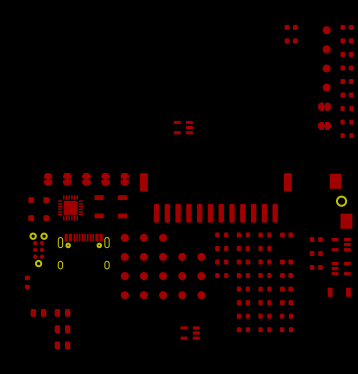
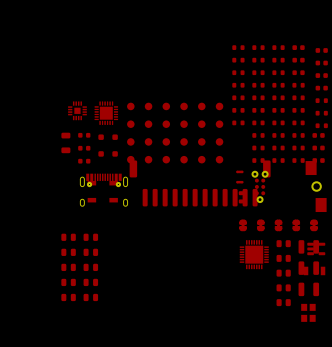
part: (291, 27) -> none
part: (347, 27) -> none
part: (326, 30) -> none
part: (291, 40) -> none
part: (347, 40) -> none
part footprint: [322, 45, 331, 54] -> [292, 45, 305, 50]
part: none -> (238, 47)
part: none -> (258, 47)
part: none -> (278, 47)
part: none -> (238, 60)
part: none -> (258, 60)
part: none -> (278, 60)
part: none -> (298, 60)
part: (326, 68) -> none
part: none -> (238, 72)
part: none -> (258, 72)
part: none -> (278, 72)
part: none -> (298, 72)
part: (326, 87) -> none
part: none -> (238, 85)
part: none -> (258, 85)
part: none -> (278, 85)
part: none -> (298, 85)
part footprint: [318, 102, 331, 111] -> [292, 95, 305, 101]
part: none -> (238, 97)
part: none -> (258, 97)
part: none -> (278, 97)
part: none -> (130, 106)
part: none -> (148, 106)
part: none -> (166, 106)
part: none -> (184, 106)
part: none -> (201, 106)
part: none -> (219, 106)
part: none -> (77, 110)
part: none -> (238, 110)
part: none -> (258, 110)
part: none -> (278, 110)
part: none -> (298, 110)
part: (324, 125) -> none
part: (183, 127) -> none
part: none -> (238, 122)
part: none -> (258, 122)
part: none -> (278, 122)
part: none -> (298, 122)
part: none -> (130, 124)
part: none -> (148, 124)
part: none -> (166, 124)
part: none -> (184, 124)
part: none -> (201, 124)
part: none -> (219, 124)
part: none -> (84, 135)
part: none -> (258, 135)
part: none -> (278, 135)
part: none -> (298, 135)
part: none -> (318, 135)
part: none -> (108, 137)
part: none -> (130, 141)
part: none -> (148, 141)
part: none -> (166, 141)
part: none -> (184, 141)
part: none -> (201, 141)
part: none -> (219, 141)
part: none -> (65, 142)
part: none -> (84, 148)
part: none -> (258, 147)
part: none -> (278, 147)
part: none -> (298, 147)
part: none -> (318, 147)
part: none -> (108, 153)
part: none -> (130, 159)
part: none -> (148, 159)
part: none -> (166, 159)
part: none -> (184, 159)
part: none -> (201, 159)
part: none -> (219, 159)
part: none -> (84, 161)
part: none -> (258, 160)
part: none -> (278, 160)
part: none -> (298, 160)
part: none -> (318, 160)
part: (48, 179) -> none
part: (67, 179) -> none
part: (86, 179) -> none
part: (105, 179) -> none
part: (124, 179) -> none
part: none -> (239, 171)
part: none -> (239, 182)
part: (38, 200) -> none
part: none -> (260, 186)
part position: (70, 207) -> (106, 113)
part: none -> (241, 197)
part: (38, 218) -> none
part: (221, 234) -> none
part: (243, 234) -> none
part: (264, 234) -> none
part: (286, 234) -> none
part: (124, 237) -> none
part: (143, 237) -> none
part: (163, 237) -> none
part footprint: [309, 237, 323, 243] -> [292, 219, 301, 232]
part footprint: [331, 237, 351, 252] -> [310, 219, 318, 232]
part: none -> (243, 225)
part: none -> (260, 225)
part: none -> (278, 225)
part: (221, 248) -> none
part: (243, 248) -> none
part: (264, 248) -> none
part: (38, 249) -> none
part position: (83, 251) -> (103, 190)
part: (316, 253) -> none
part: none -> (68, 237)
part: none -> (90, 237)
part: (124, 256) -> none
part: (143, 256) -> none
part: (163, 256) -> none
part: (182, 256) -> none
part: (201, 256) -> none
part: (221, 262) -> none
part: (243, 262) -> none
part: (264, 262) -> none
part: (286, 262) -> none
part: none -> (283, 243)
part: none -> (308, 246)
part: (316, 267) -> none
part: none -> (68, 252)
part: none -> (90, 252)
part: none -> (254, 254)
part: (221, 275) -> none
part: (243, 275) -> none
part: (264, 275) -> none
part: (286, 275) -> none
part: (124, 276) -> none
part: (143, 276) -> none
part: (163, 276) -> none
part: (182, 276) -> none
part: (201, 276) -> none
part: none -> (283, 258)
part: (27, 282) -> none
part: none -> (68, 267)
part: none -> (90, 267)
part: (243, 289) -> none
part: (264, 289) -> none
part: (286, 289) -> none
part: none -> (308, 268)
part: none -> (283, 273)
part: (124, 295) -> none
part: (143, 295) -> none
part: (163, 295) -> none
part: (182, 295) -> none
part: (201, 295) -> none
part: (243, 302) -> none
part: (264, 302) -> none
part: (286, 302) -> none
part: none -> (68, 282)
part: none -> (90, 282)
part: none -> (283, 287)
part: (38, 312) -> none
part: (62, 312) -> none
part: none -> (308, 289)
part: (243, 316) -> none
part: (264, 316) -> none
part: (286, 316) -> none
part: none -> (68, 297)
part: none -> (90, 297)
part: none -> (283, 302)
part: (62, 329) -> none
part: (243, 329) -> none
part: (264, 329) -> none
part: (286, 329) -> none
part: (190, 333) -> none
part: none -> (308, 312)
part: (62, 345) -> none

